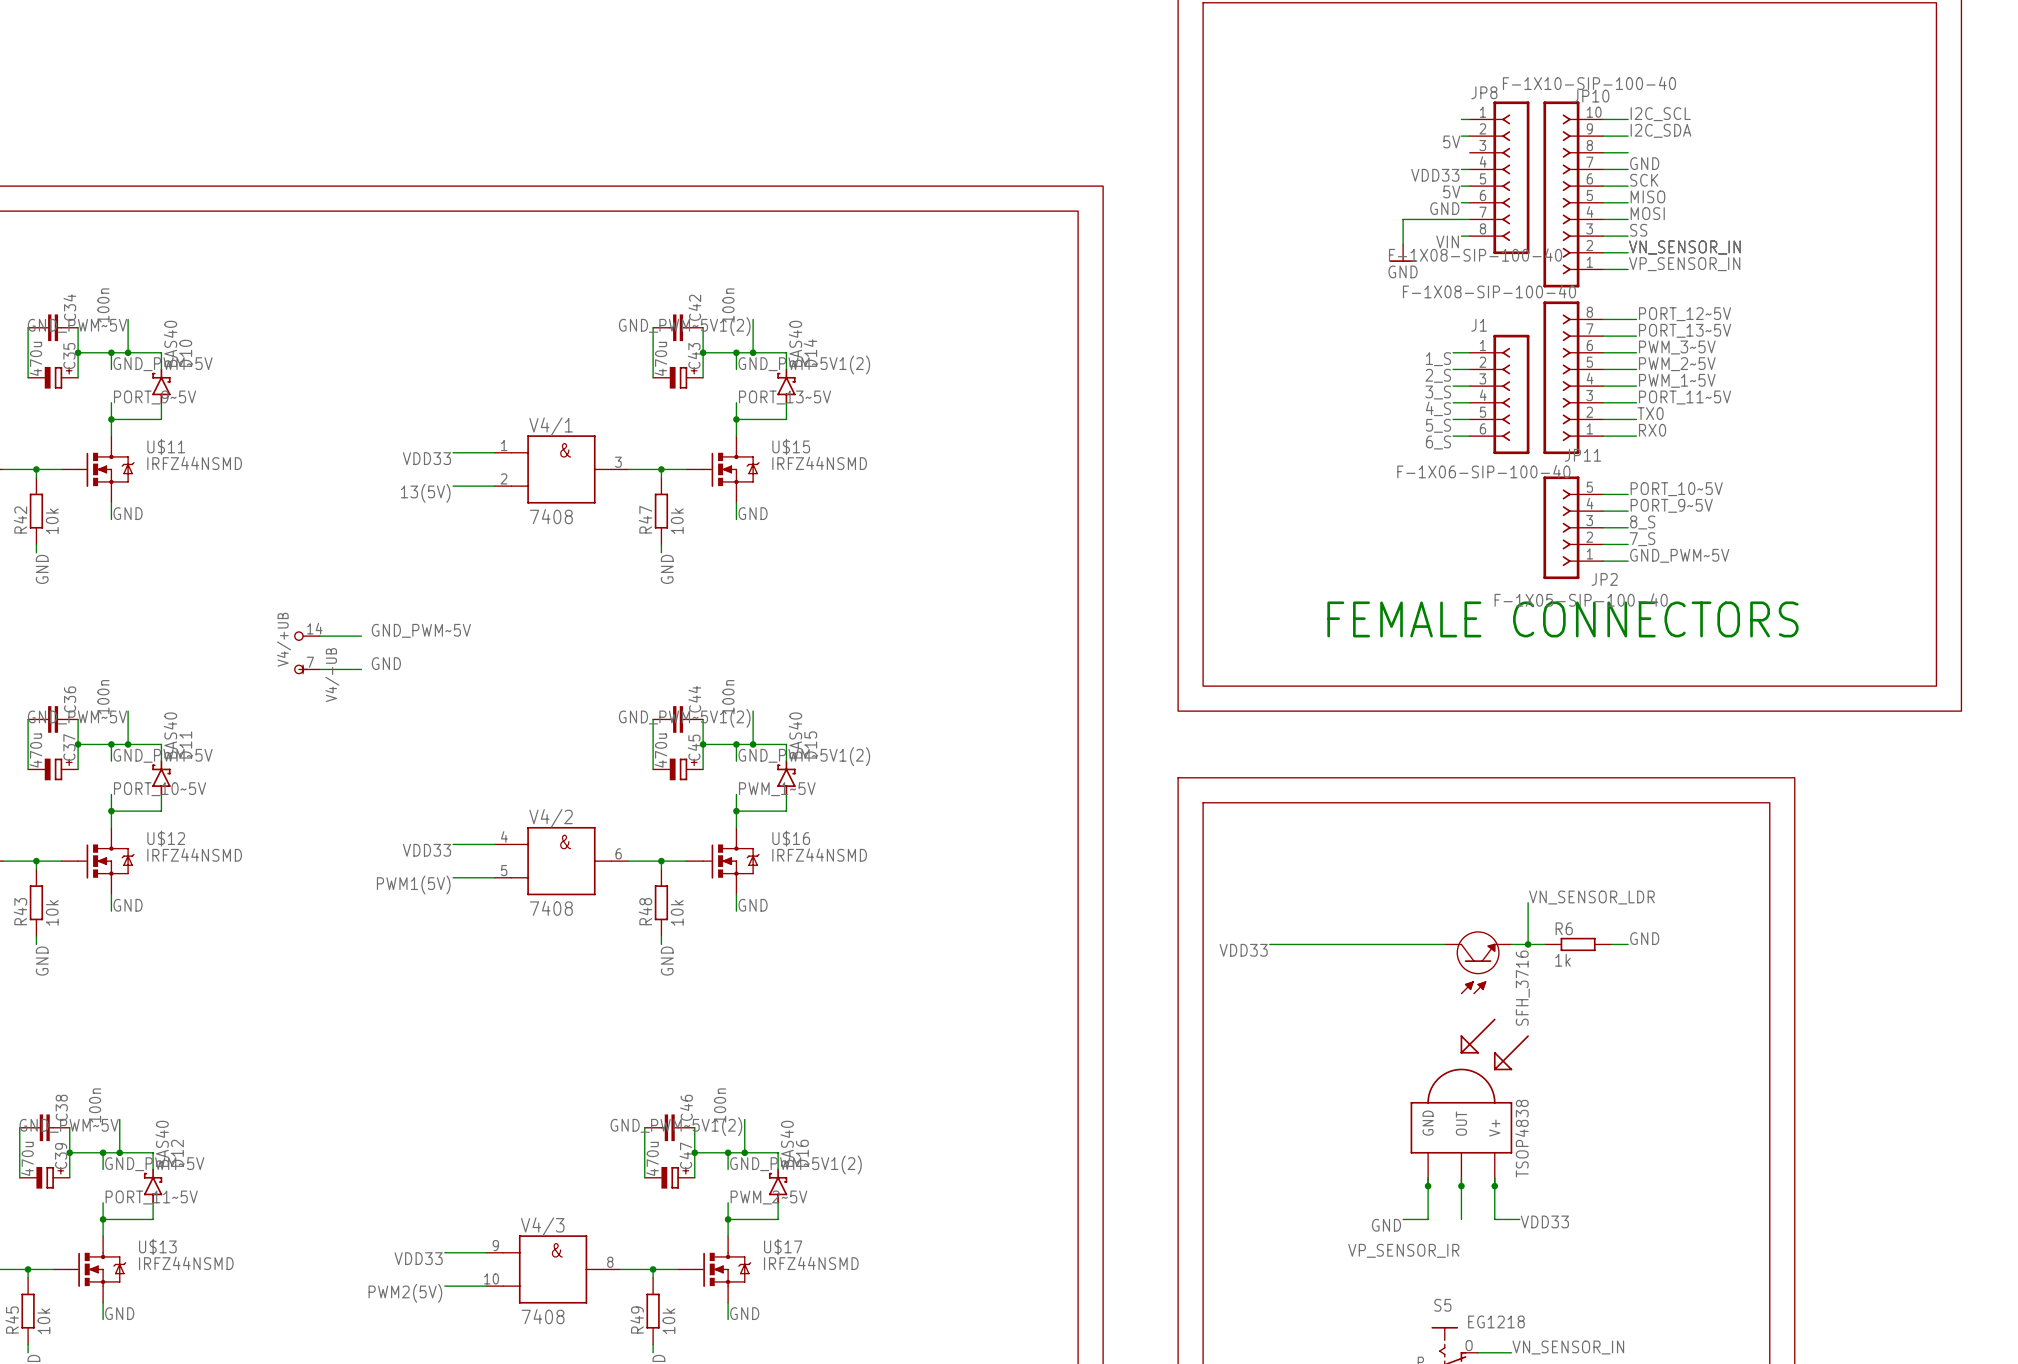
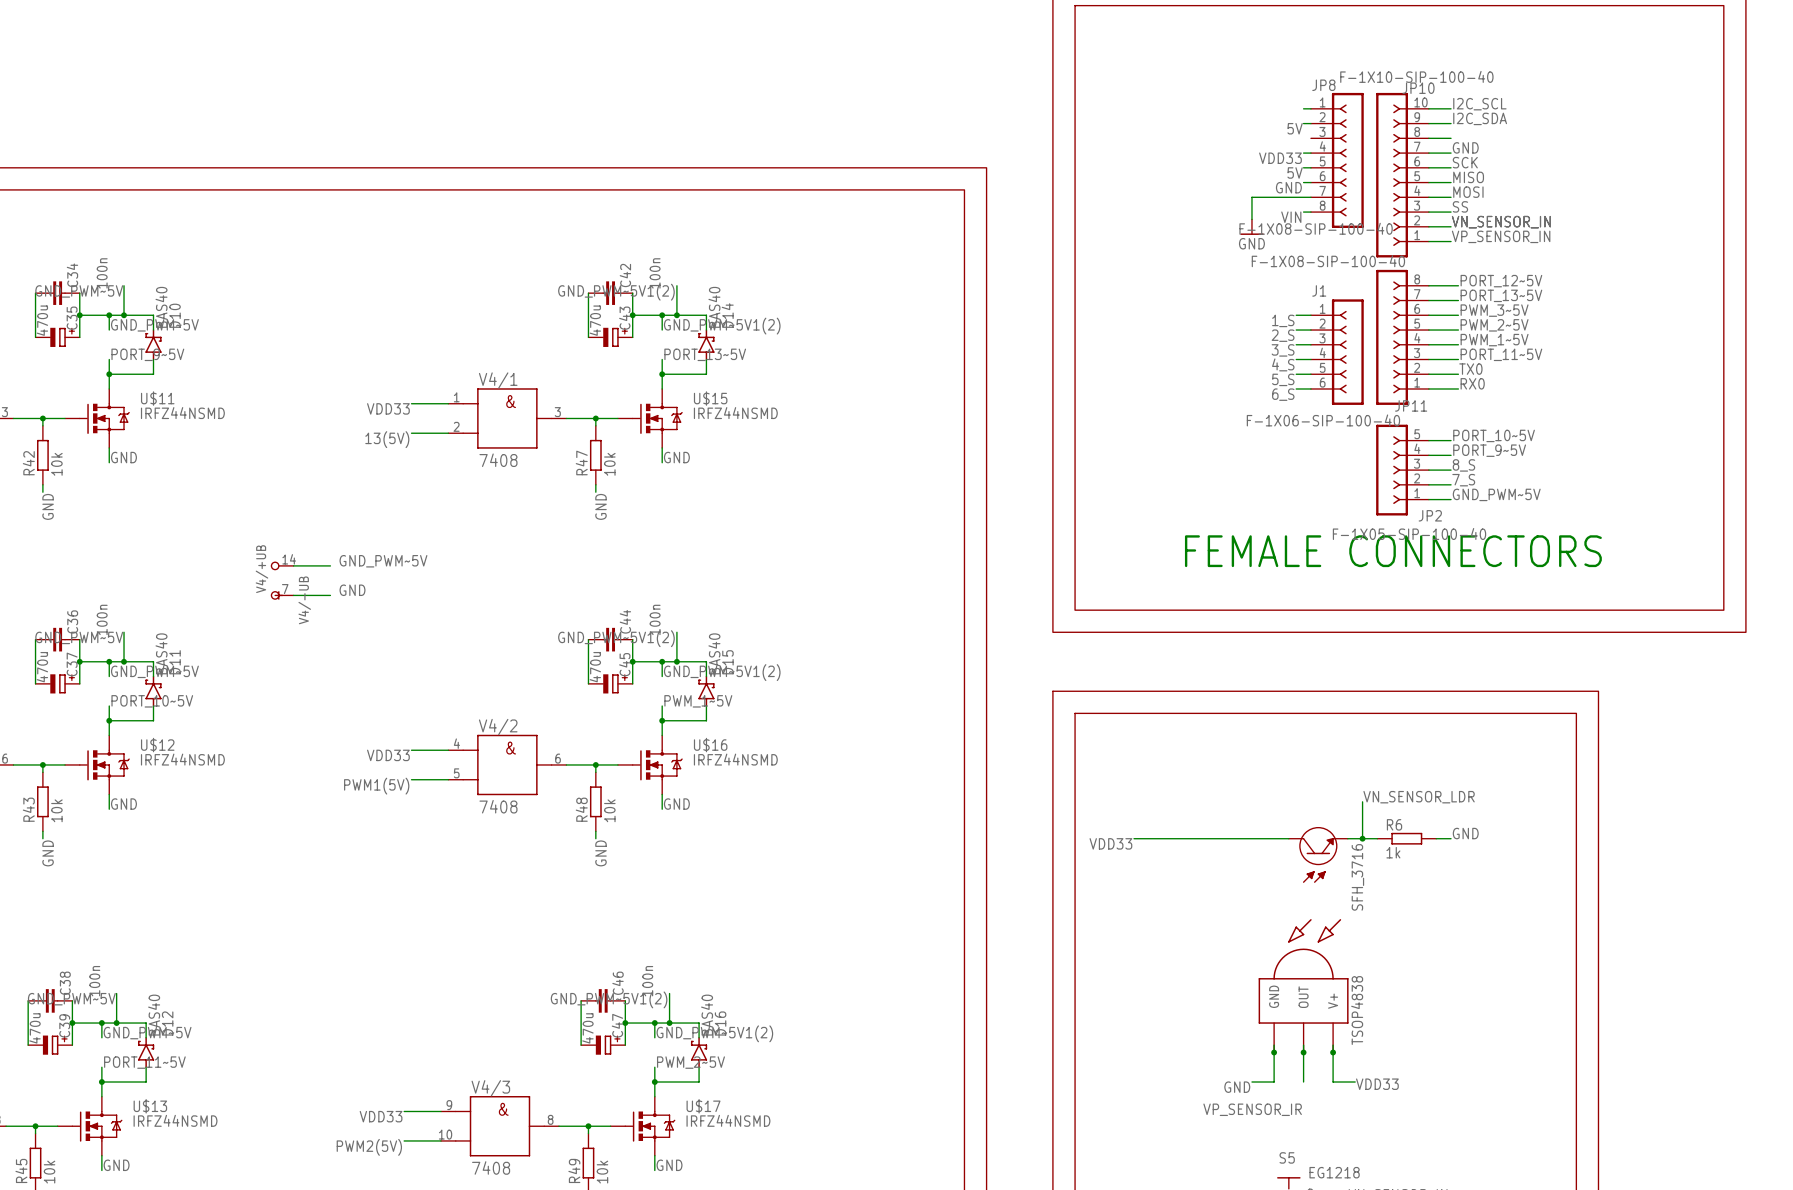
part: TSOP4838 (1469, 1102) -> none
part: none -> TSOP4838 (1303, 985)

